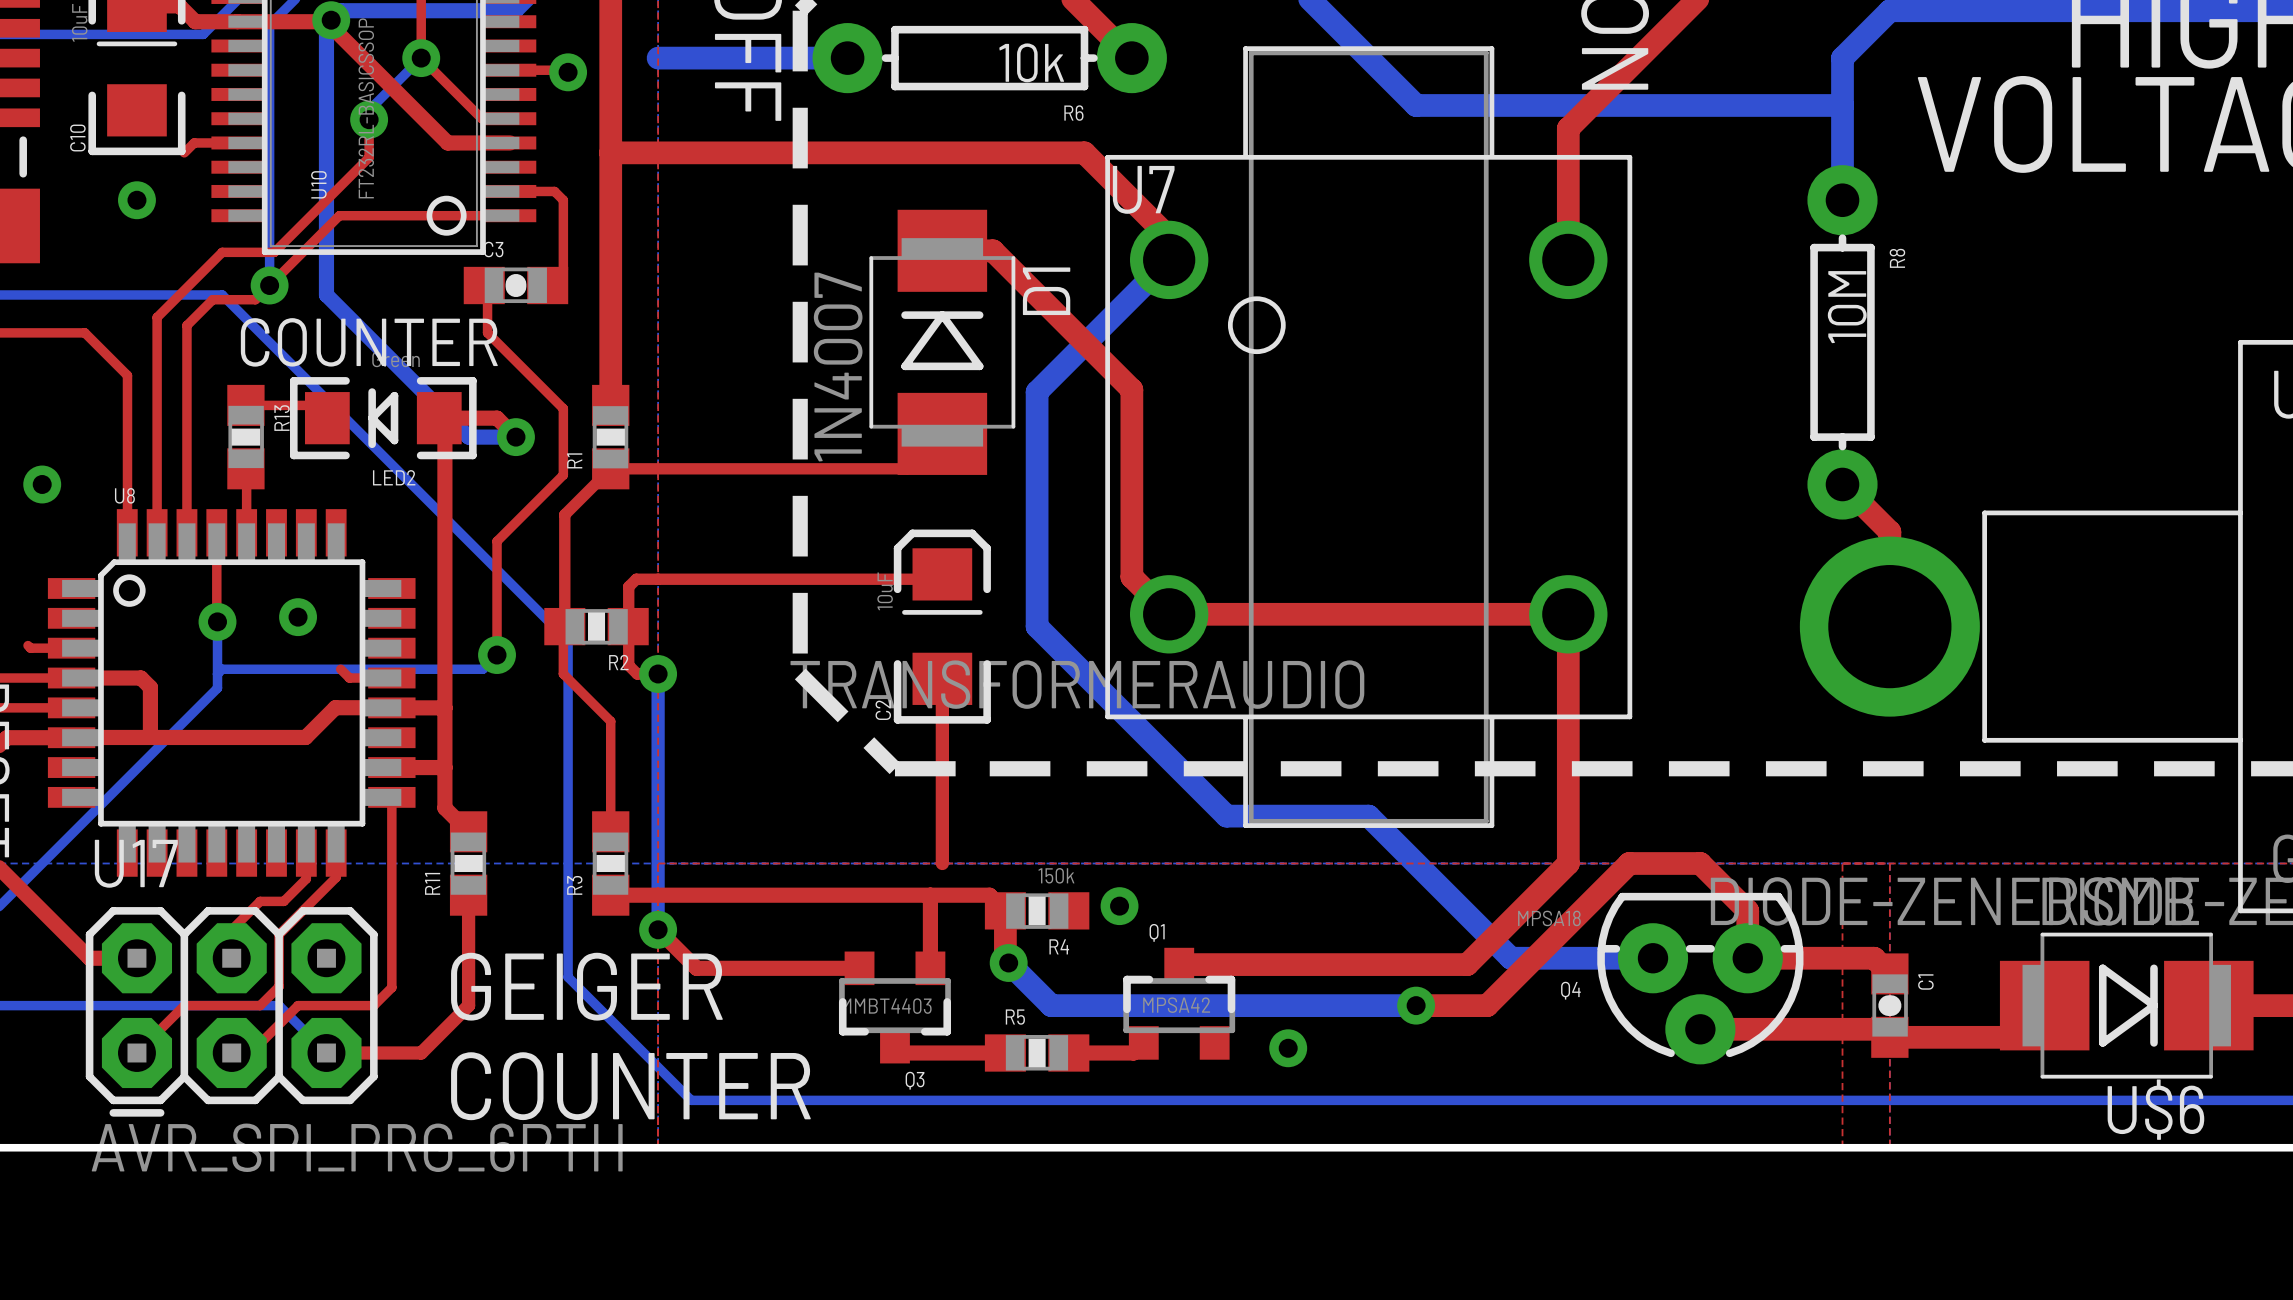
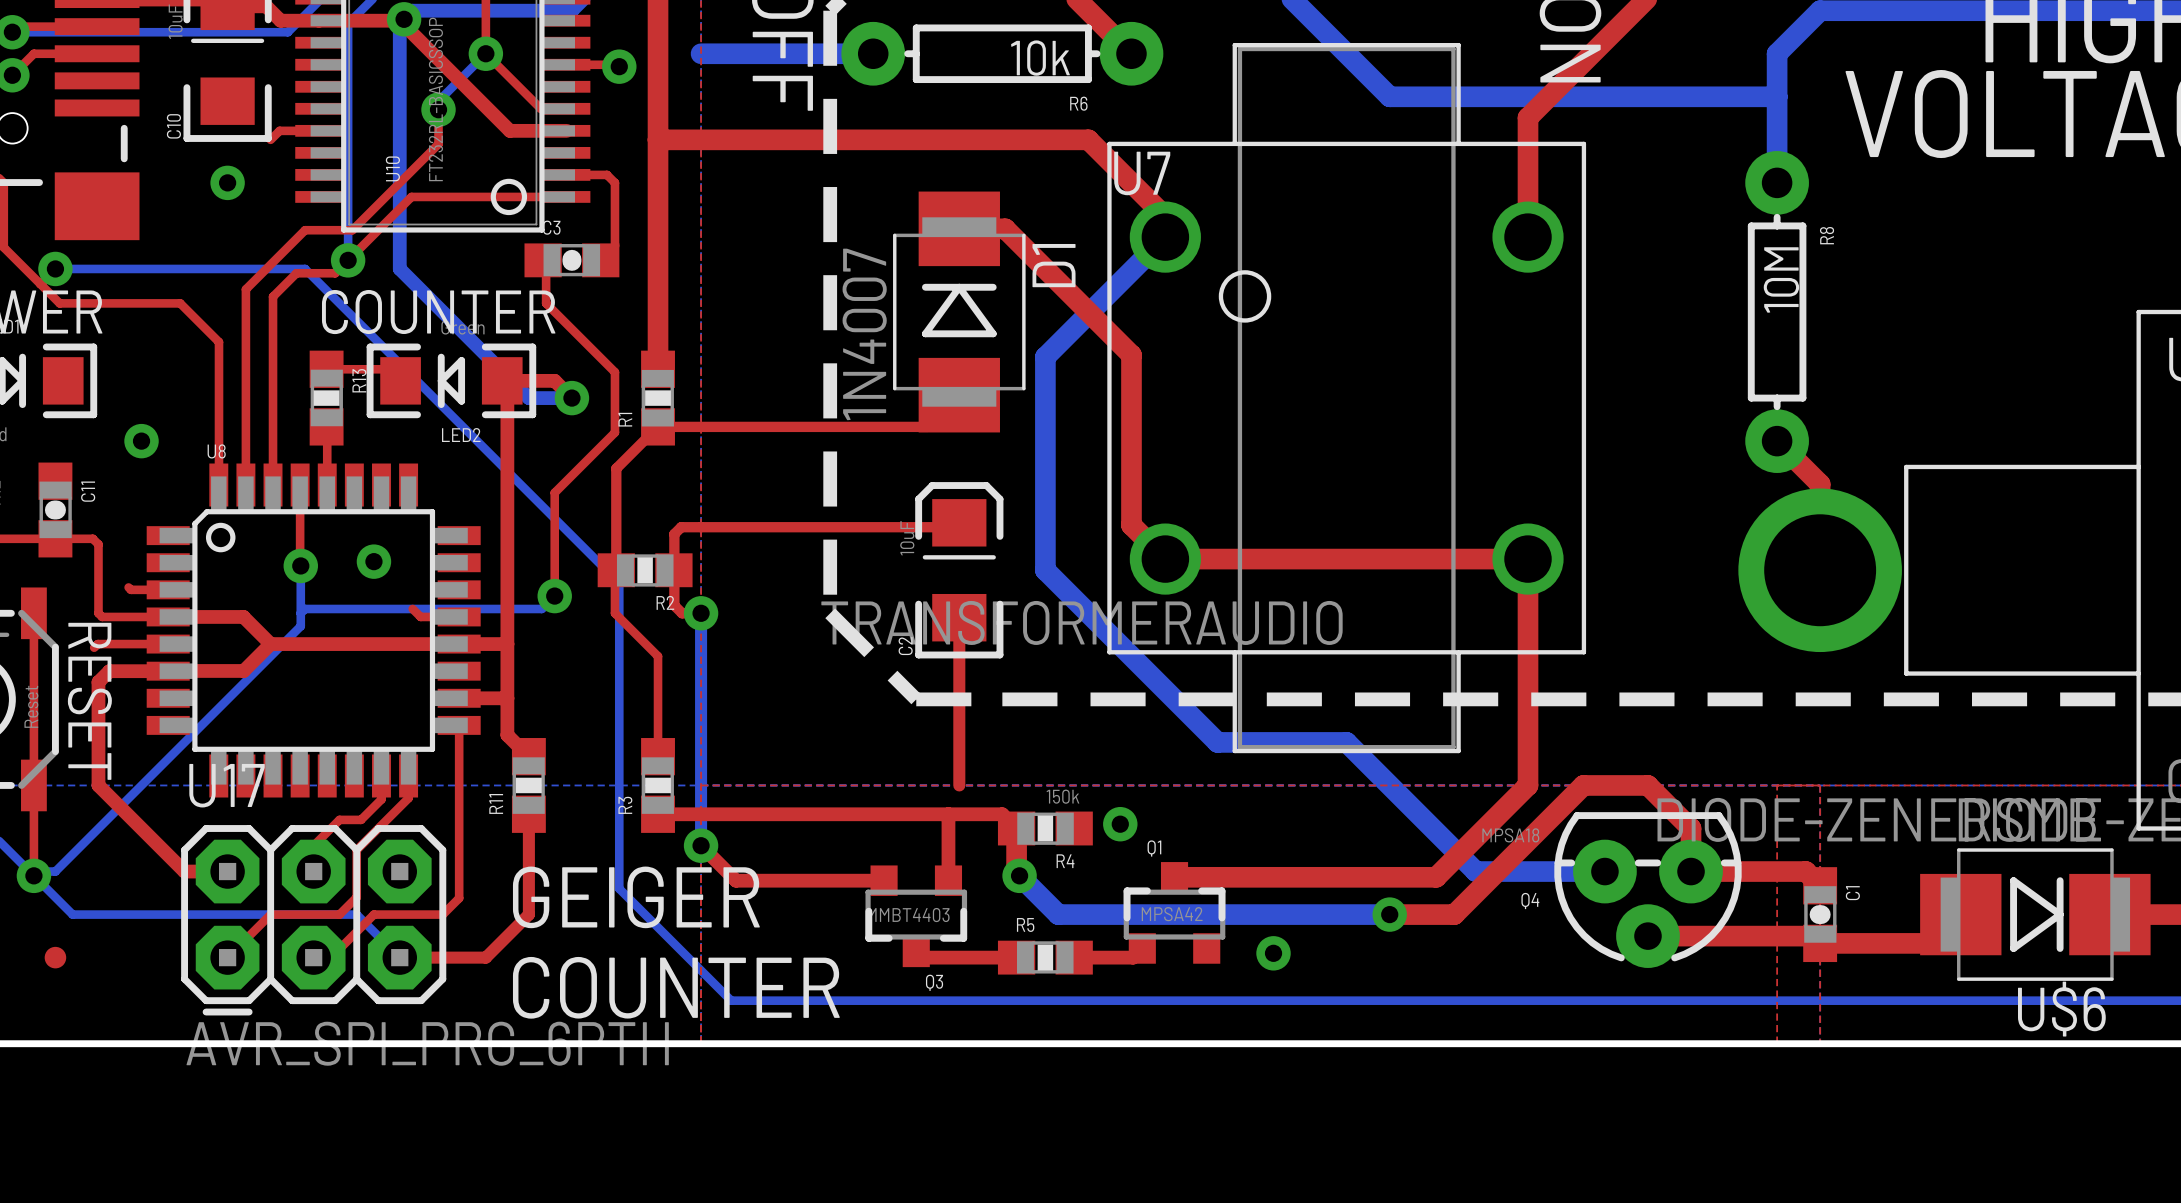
top track: (140, 678) (150, 687) (150, 733) (154, 737) -> (231, 616) (243, 616) (270, 644)
top track: none -> (270, 644) (243, 670)
top track: (391, 707) (335, 707) (305, 737) (154, 737) -> (459, 644) (270, 644)

